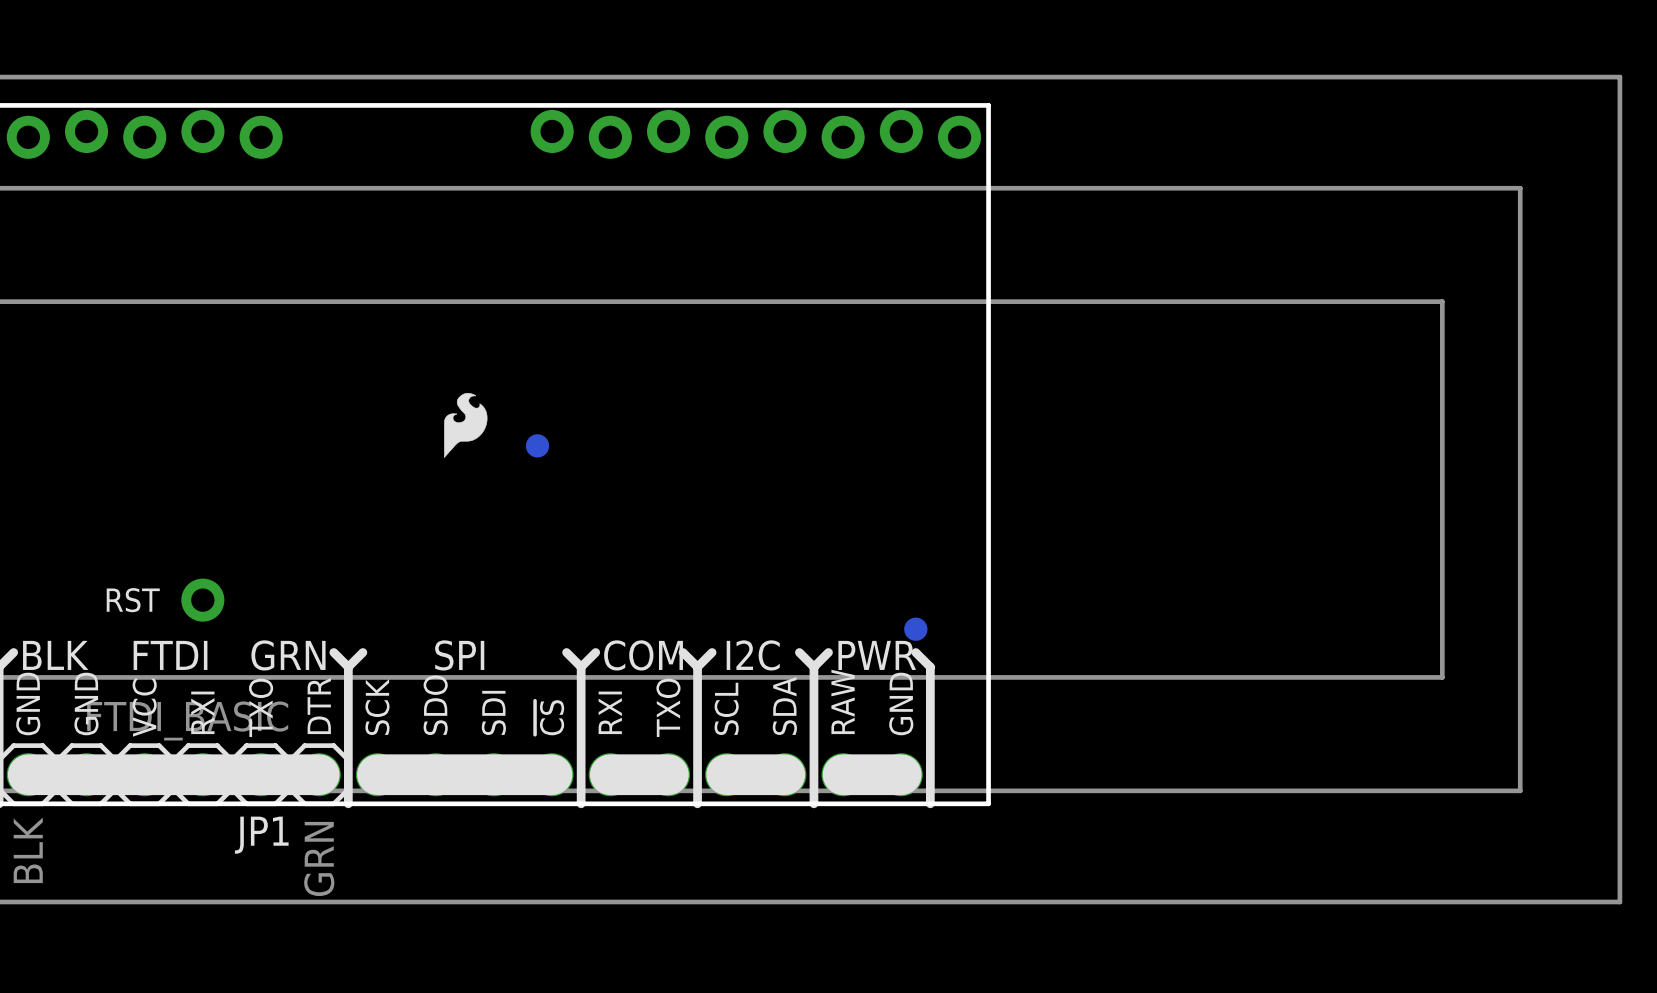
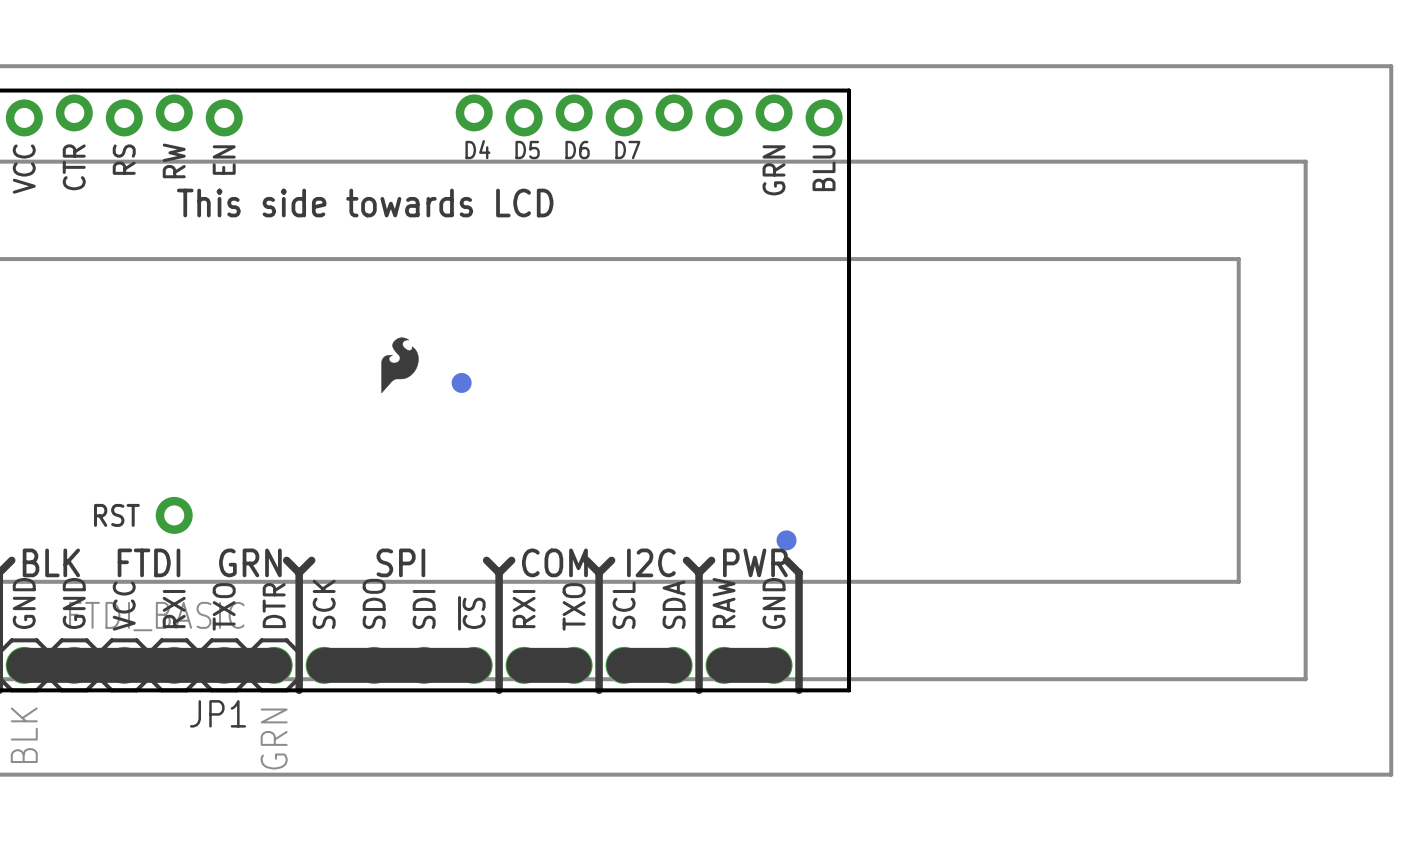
text: none -> D4 (477, 149)
text: none -> D5 (527, 150)
text: none -> D6 (577, 150)
text: none -> D7 (627, 150)
text: none -> RS (124, 159)
text: none -> EN (224, 160)
text: none -> RW (174, 160)
text: none -> BLU (824, 168)
text: none -> CTR (74, 167)
text: none -> VCC (24, 169)
text: none -> GRN (774, 170)
text: none -> This side towards LCD (365, 203)

